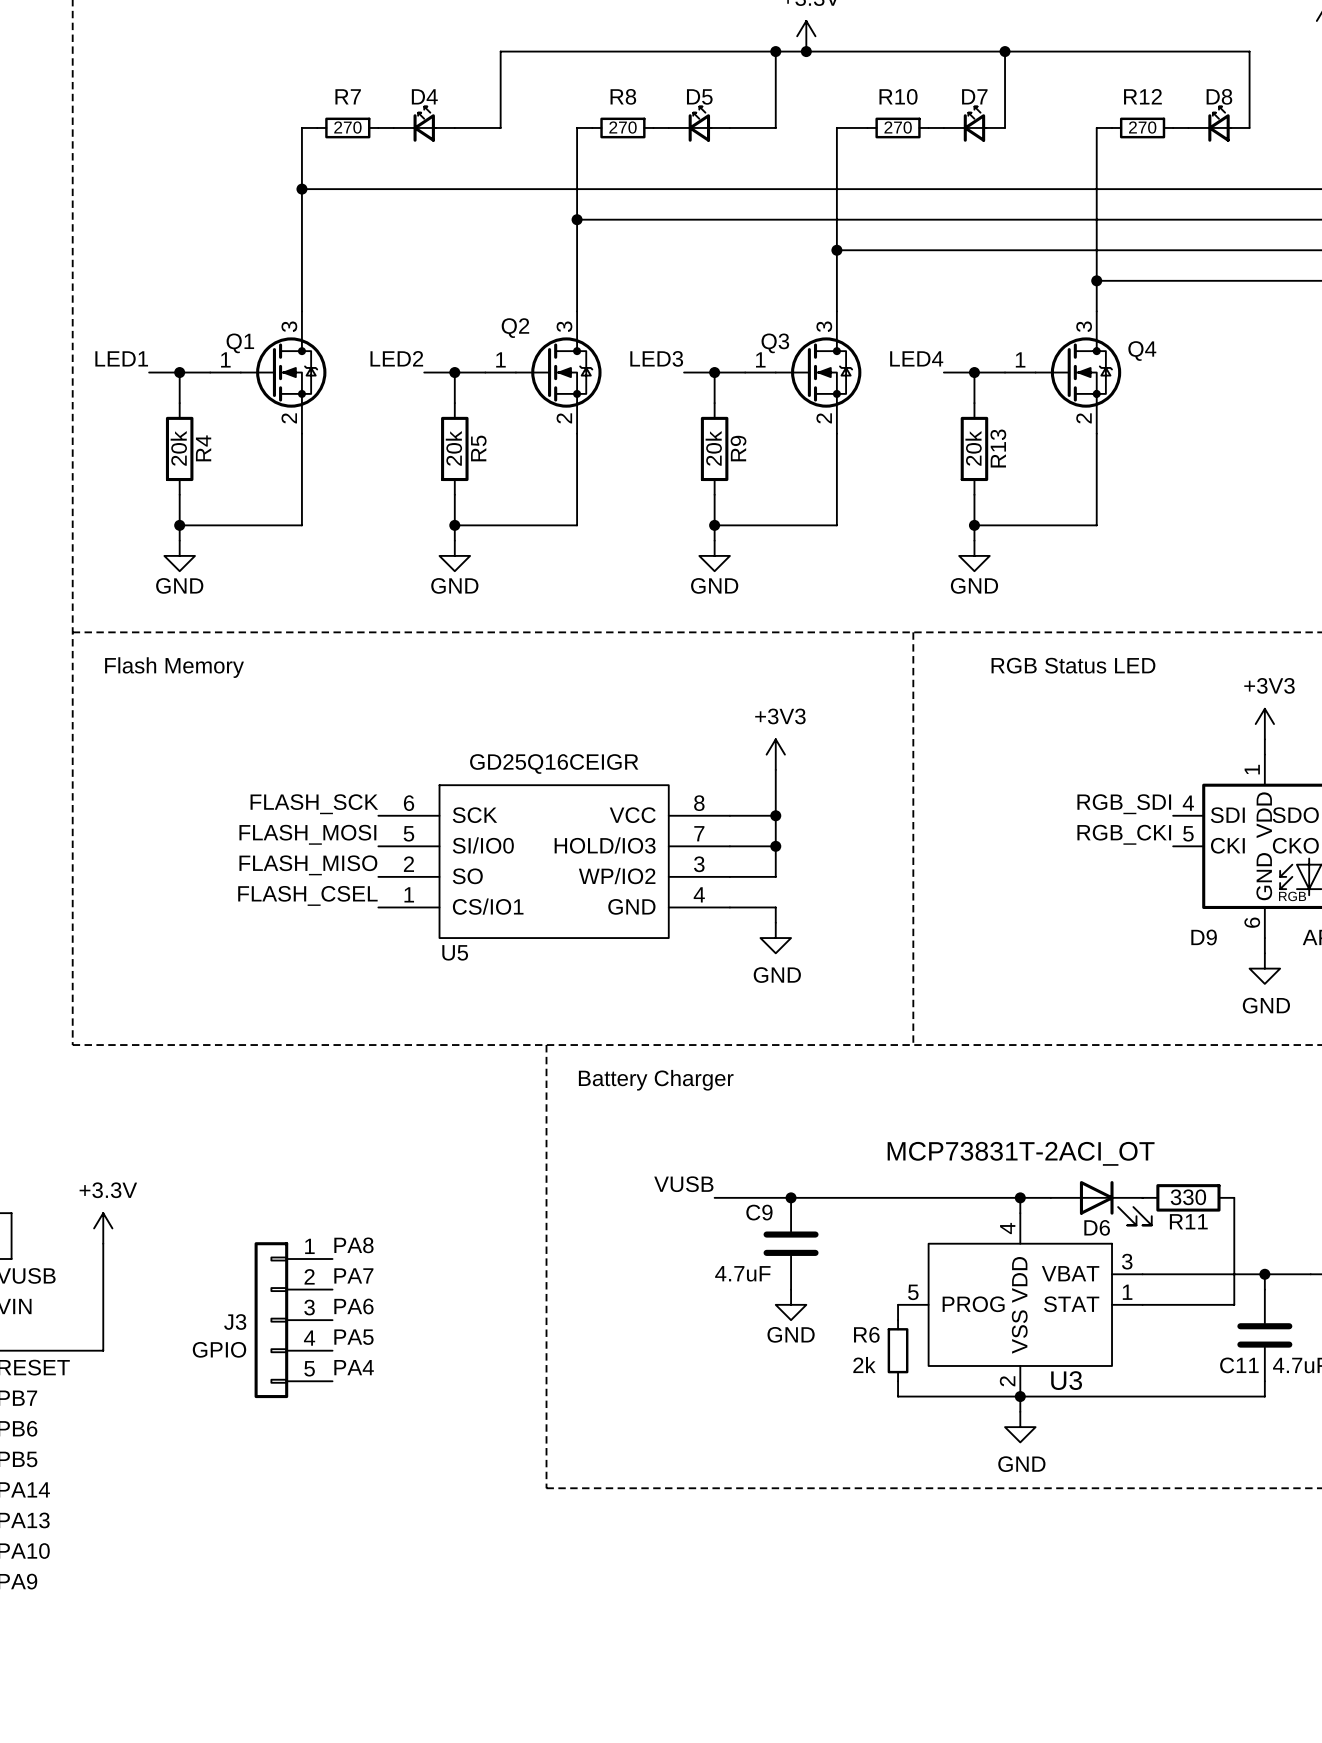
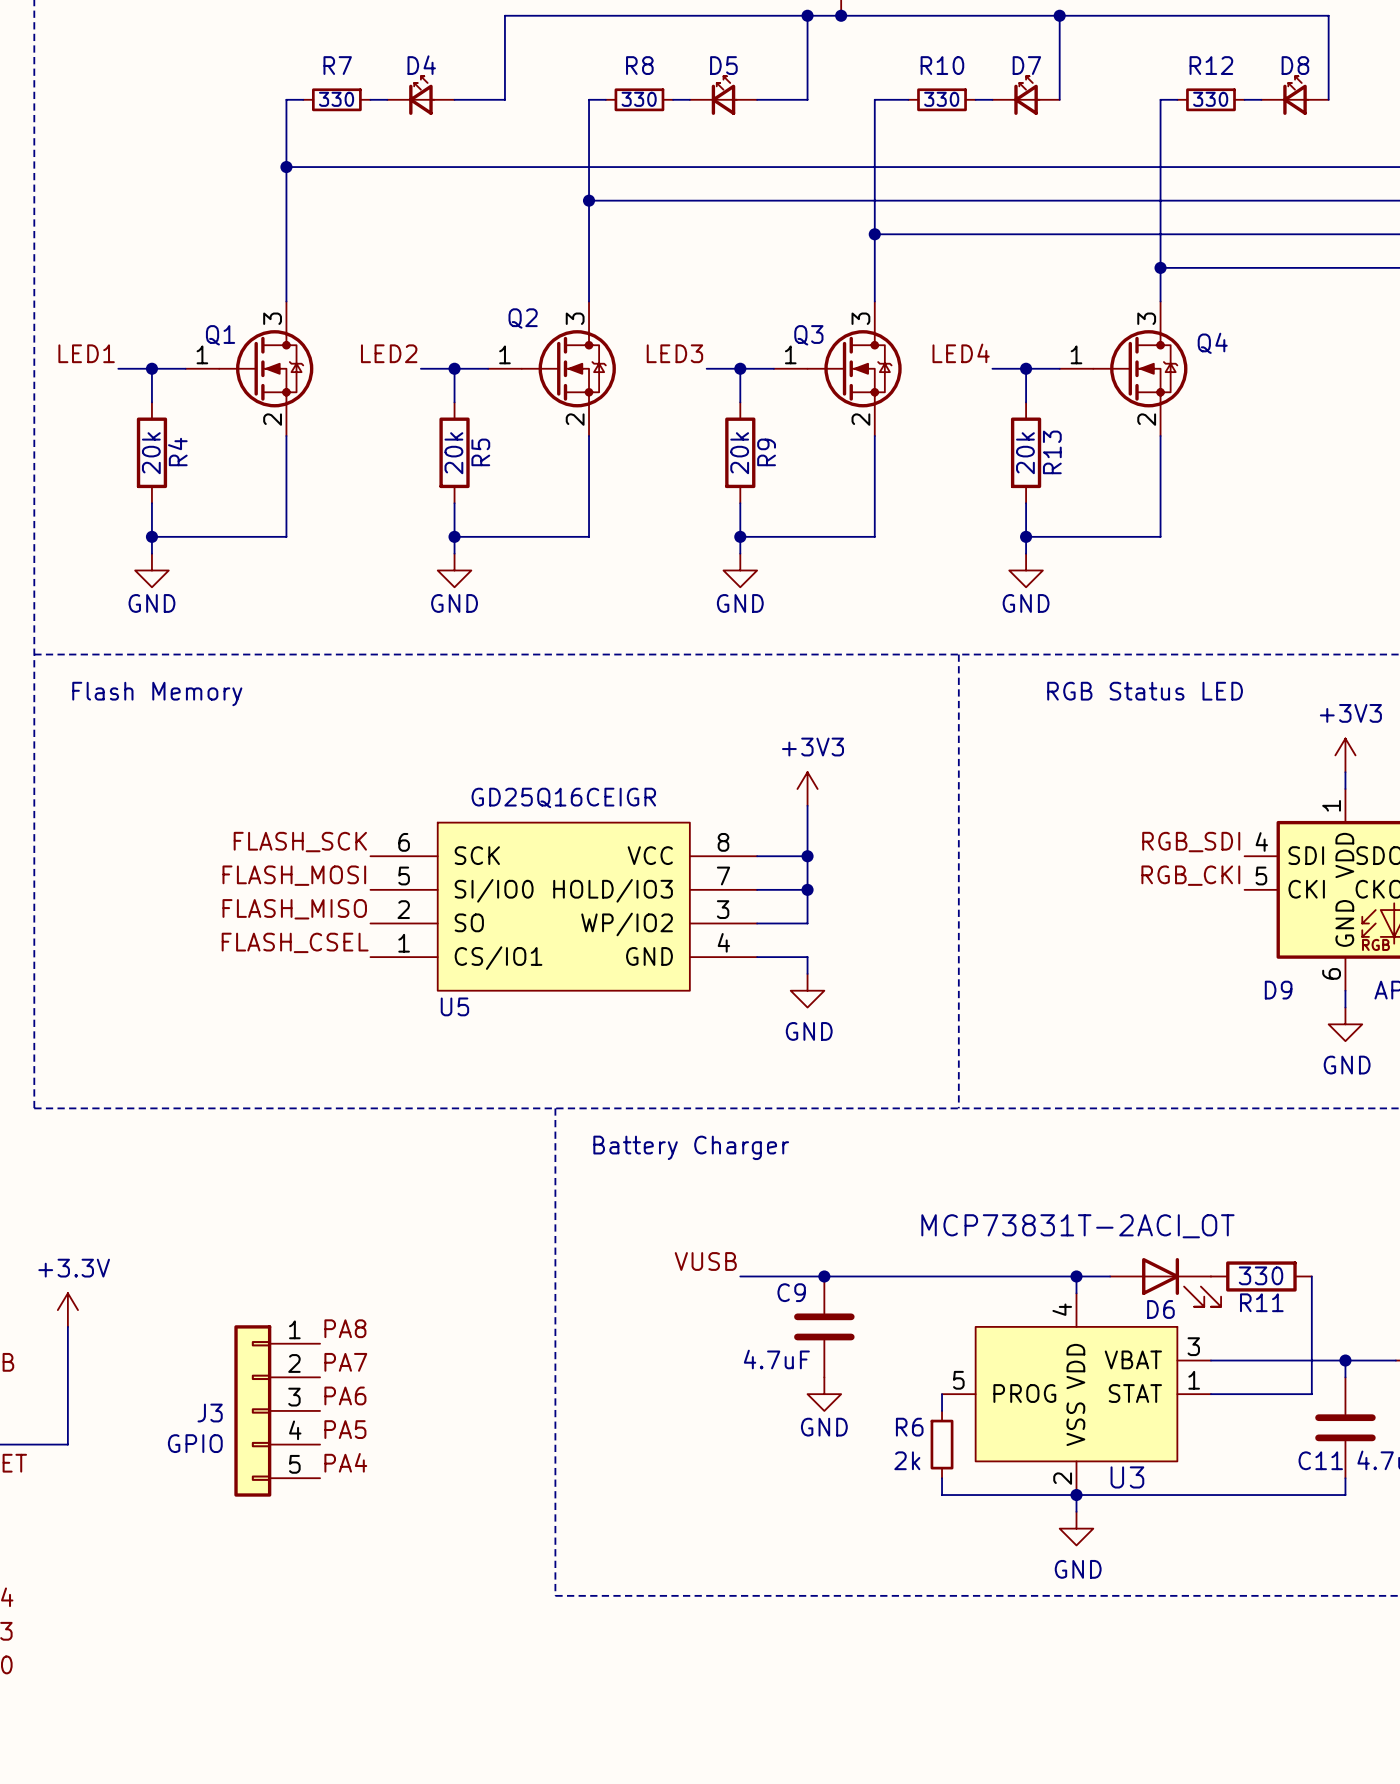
R7 value: 270 (347, 127) -> 330 (336, 99)
R8 value: 270 (623, 127) -> 330 (639, 99)
R10 value: 270 (898, 127) -> 330 (941, 99)
R12 value: 270 (1142, 127) -> 330 (1210, 99)

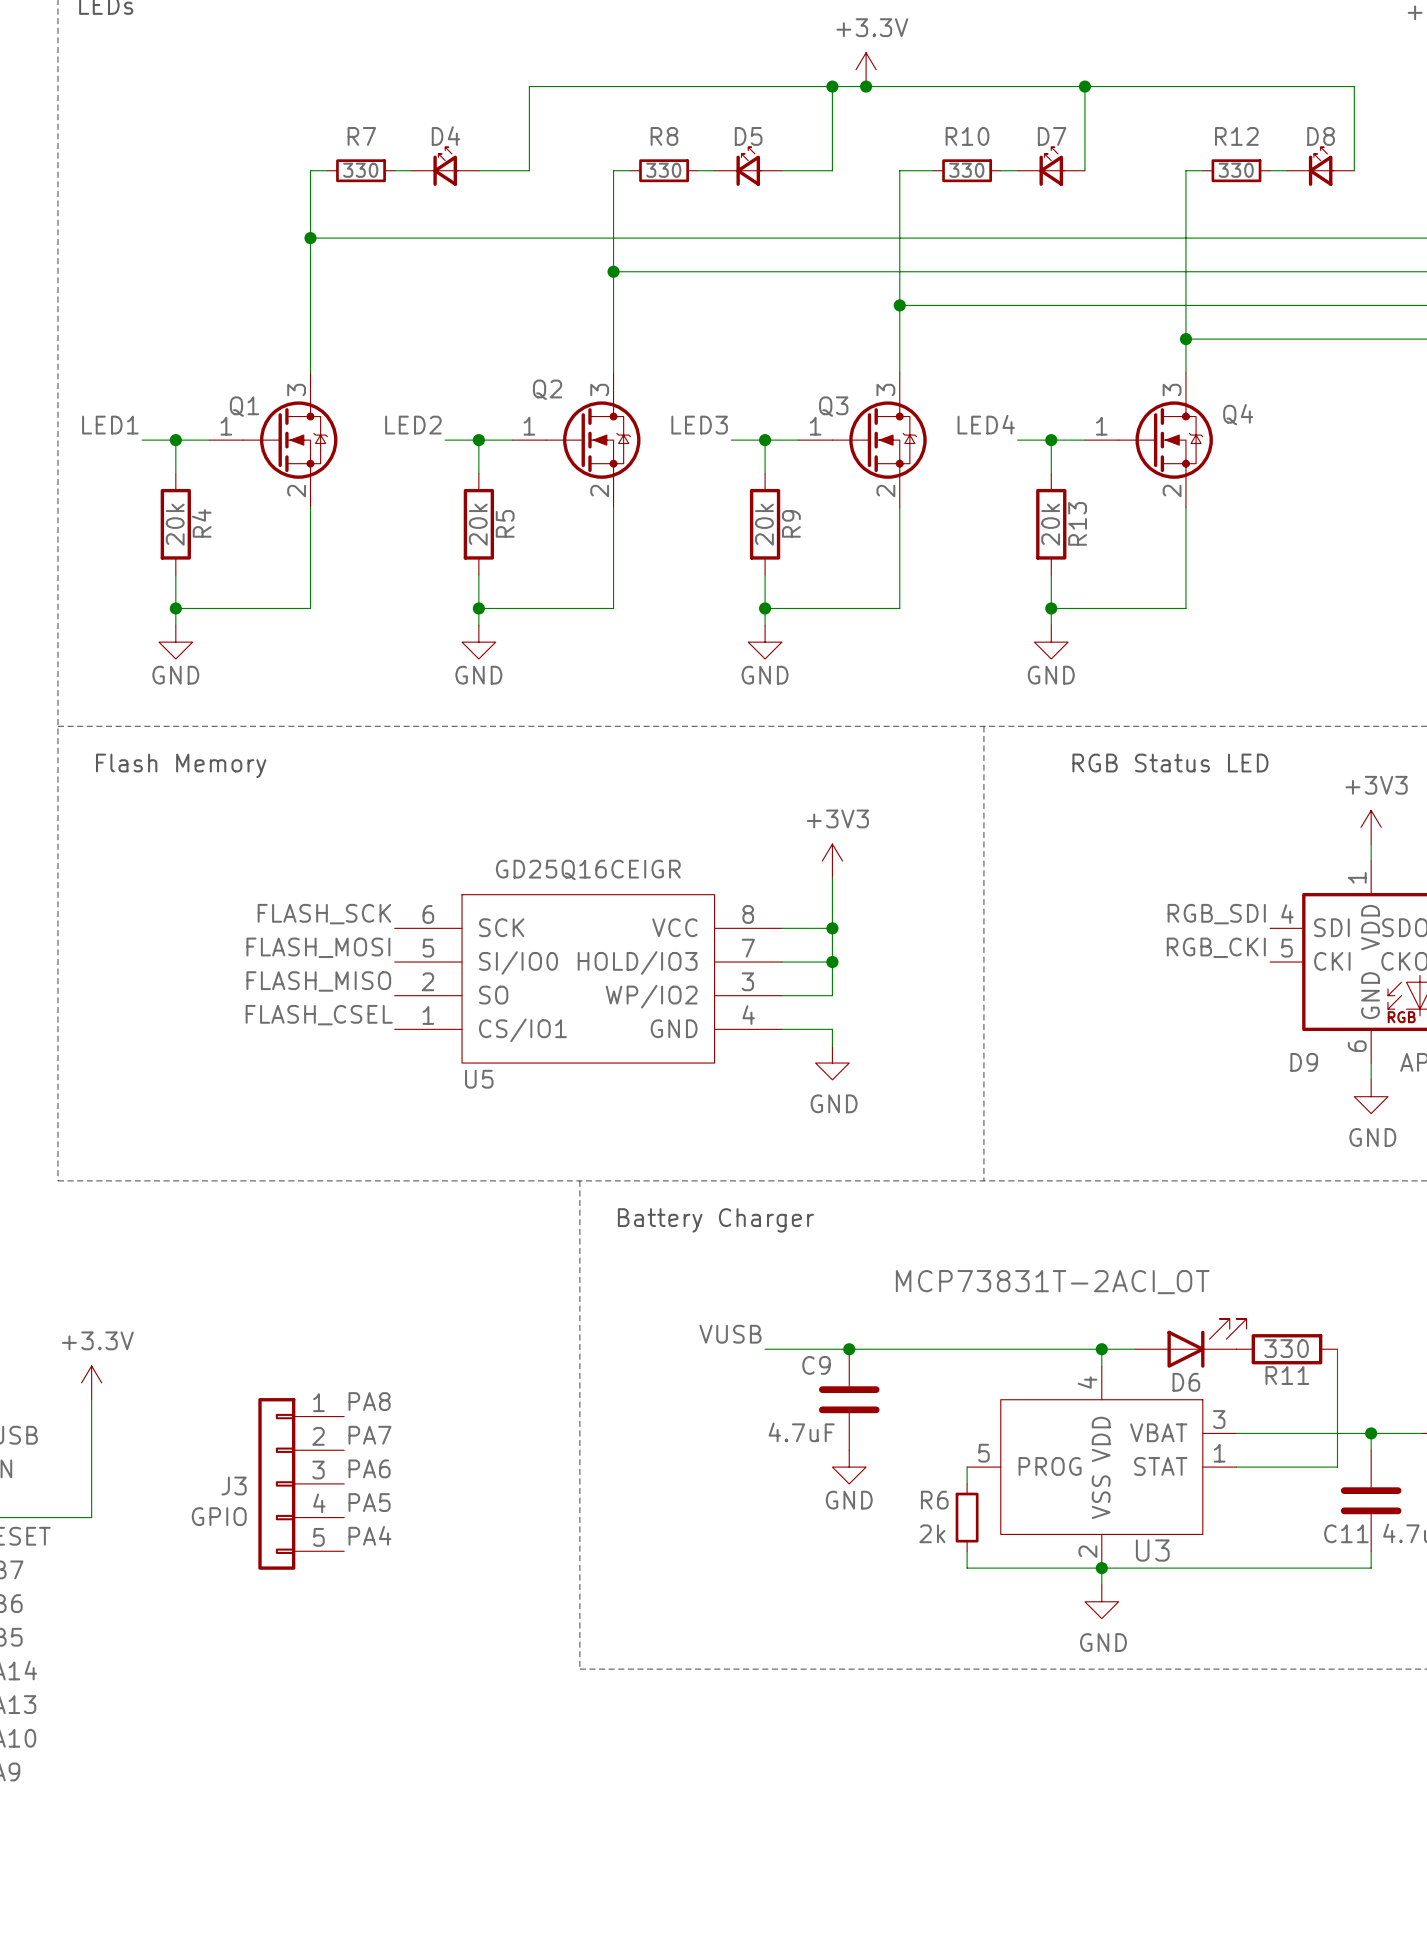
U3 value position: MCP73831T-2ACI_OT (1077, 1226) -> MCP73831T-2ACI_OT (1052, 1282)
D6 flip: as is (1181, 1282) -> up-down (1207, 1343)

